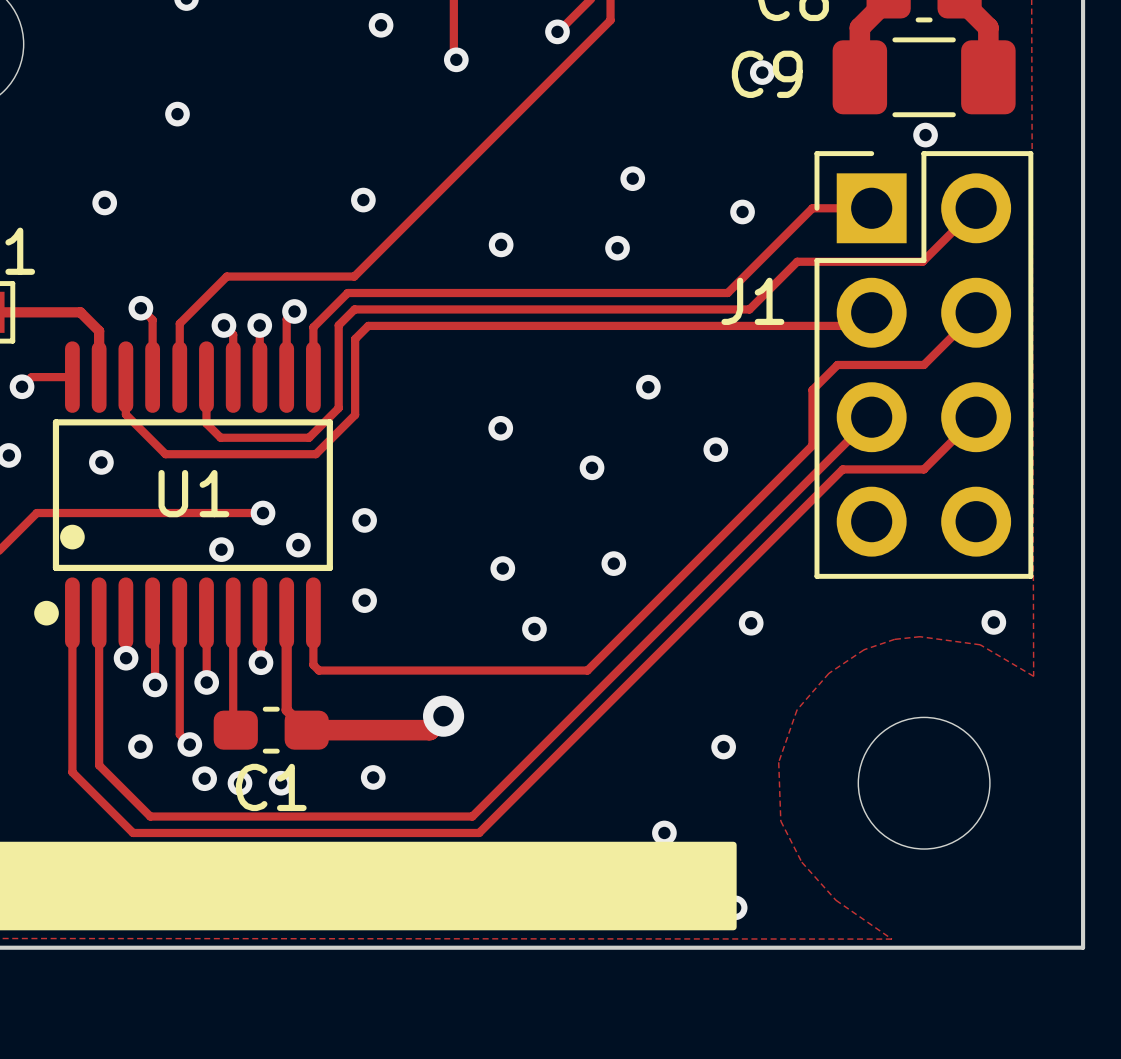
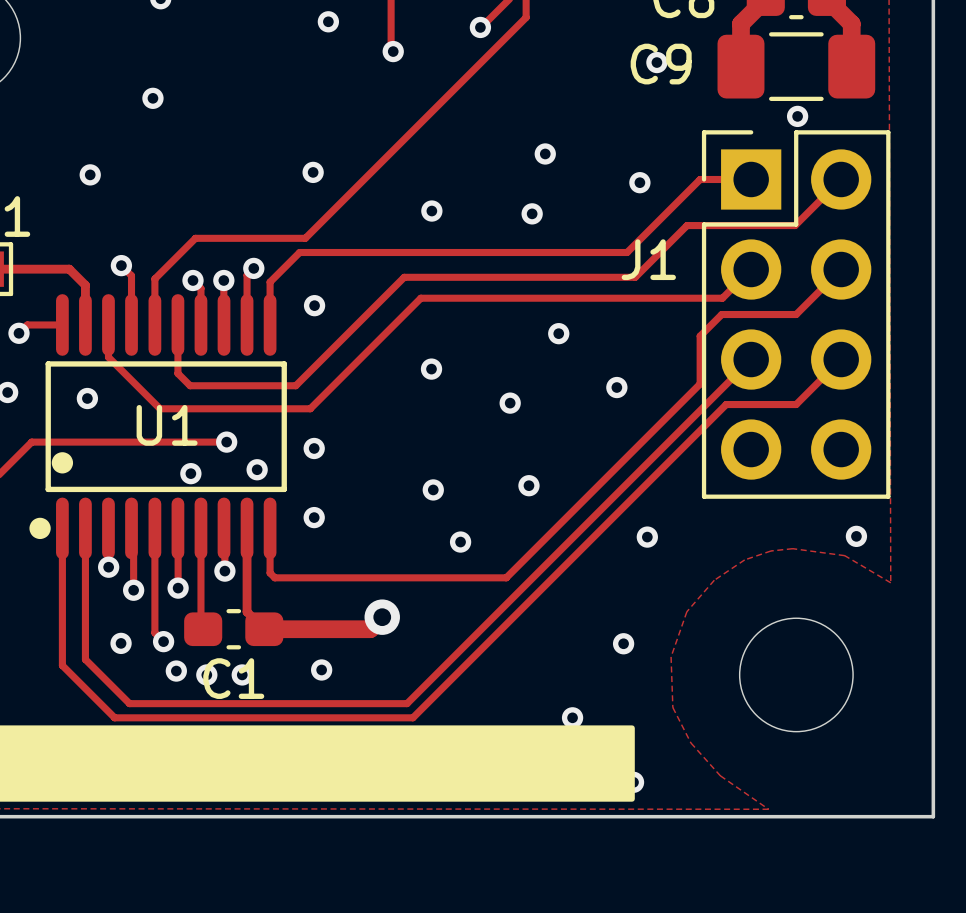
track: (749, 309) (354, 309) (338, 325) (338, 408) (309, 437) (220, 437) (206, 423) -> (645, 266) (635, 277) (404, 277) (295, 385) (190, 385) (177, 373) (177, 365)
track: (858, 325) (368, 325) (355, 339) (355, 414) (315, 454) (165, 454) -> (739, 280) (722, 298) (420, 298) (310, 408) (160, 408) (142, 391)
via: none -> (314, 305)

